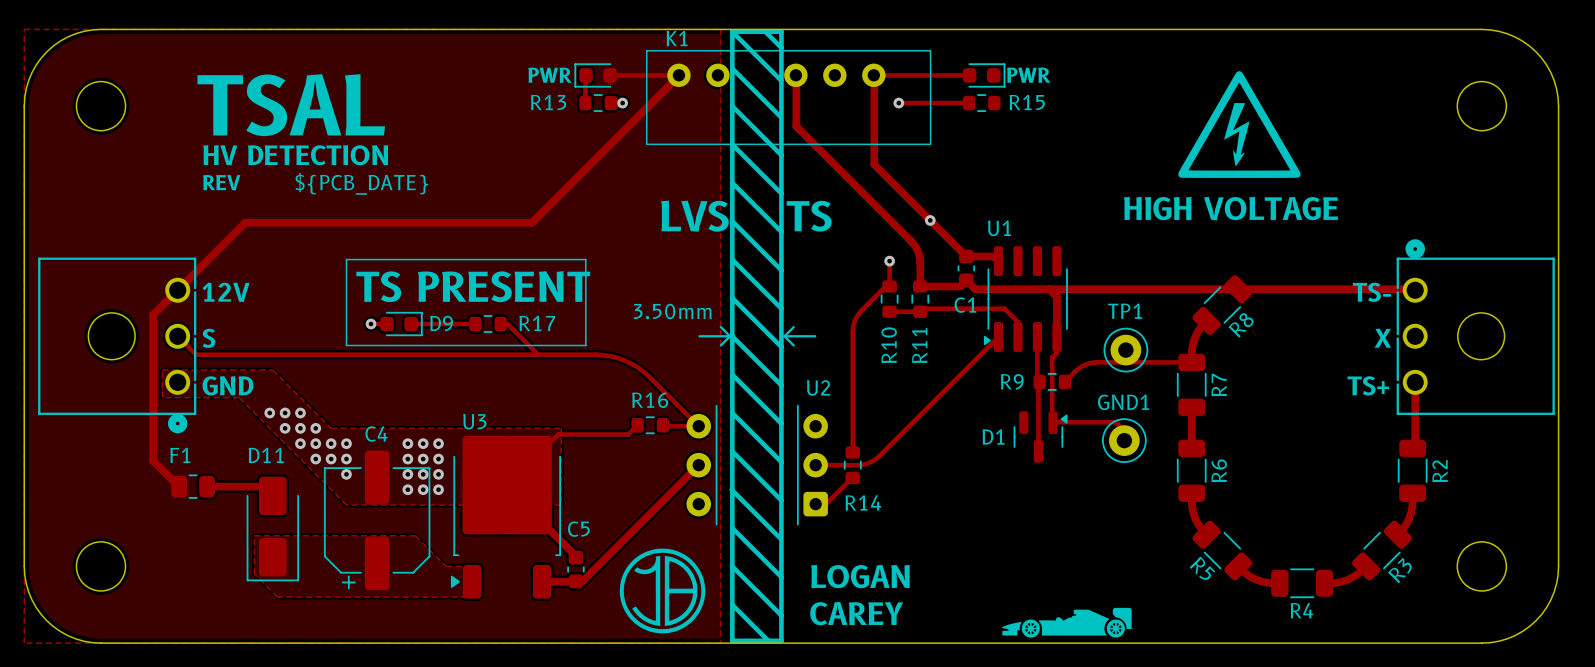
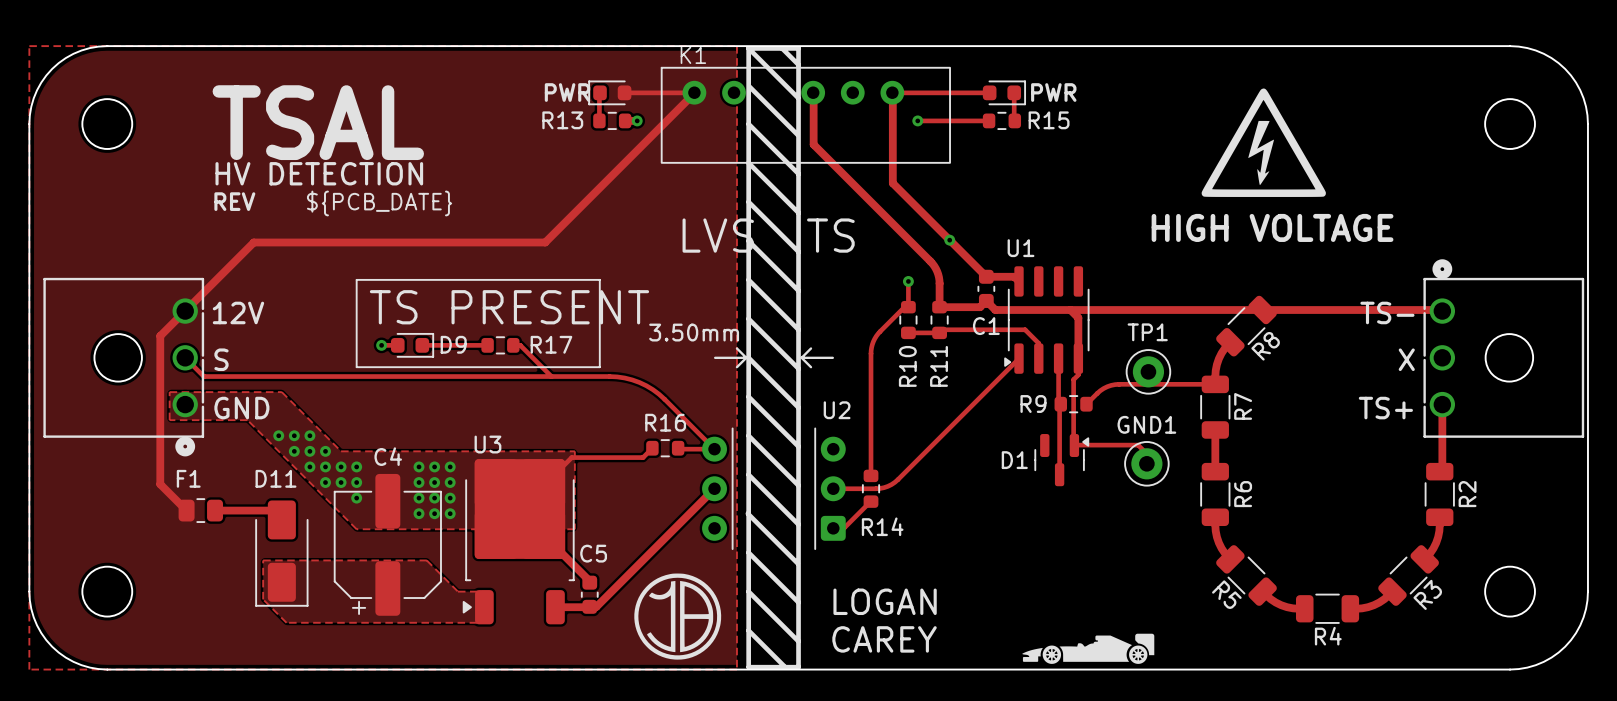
track: none -> (1014, 92) (1014, 120)

